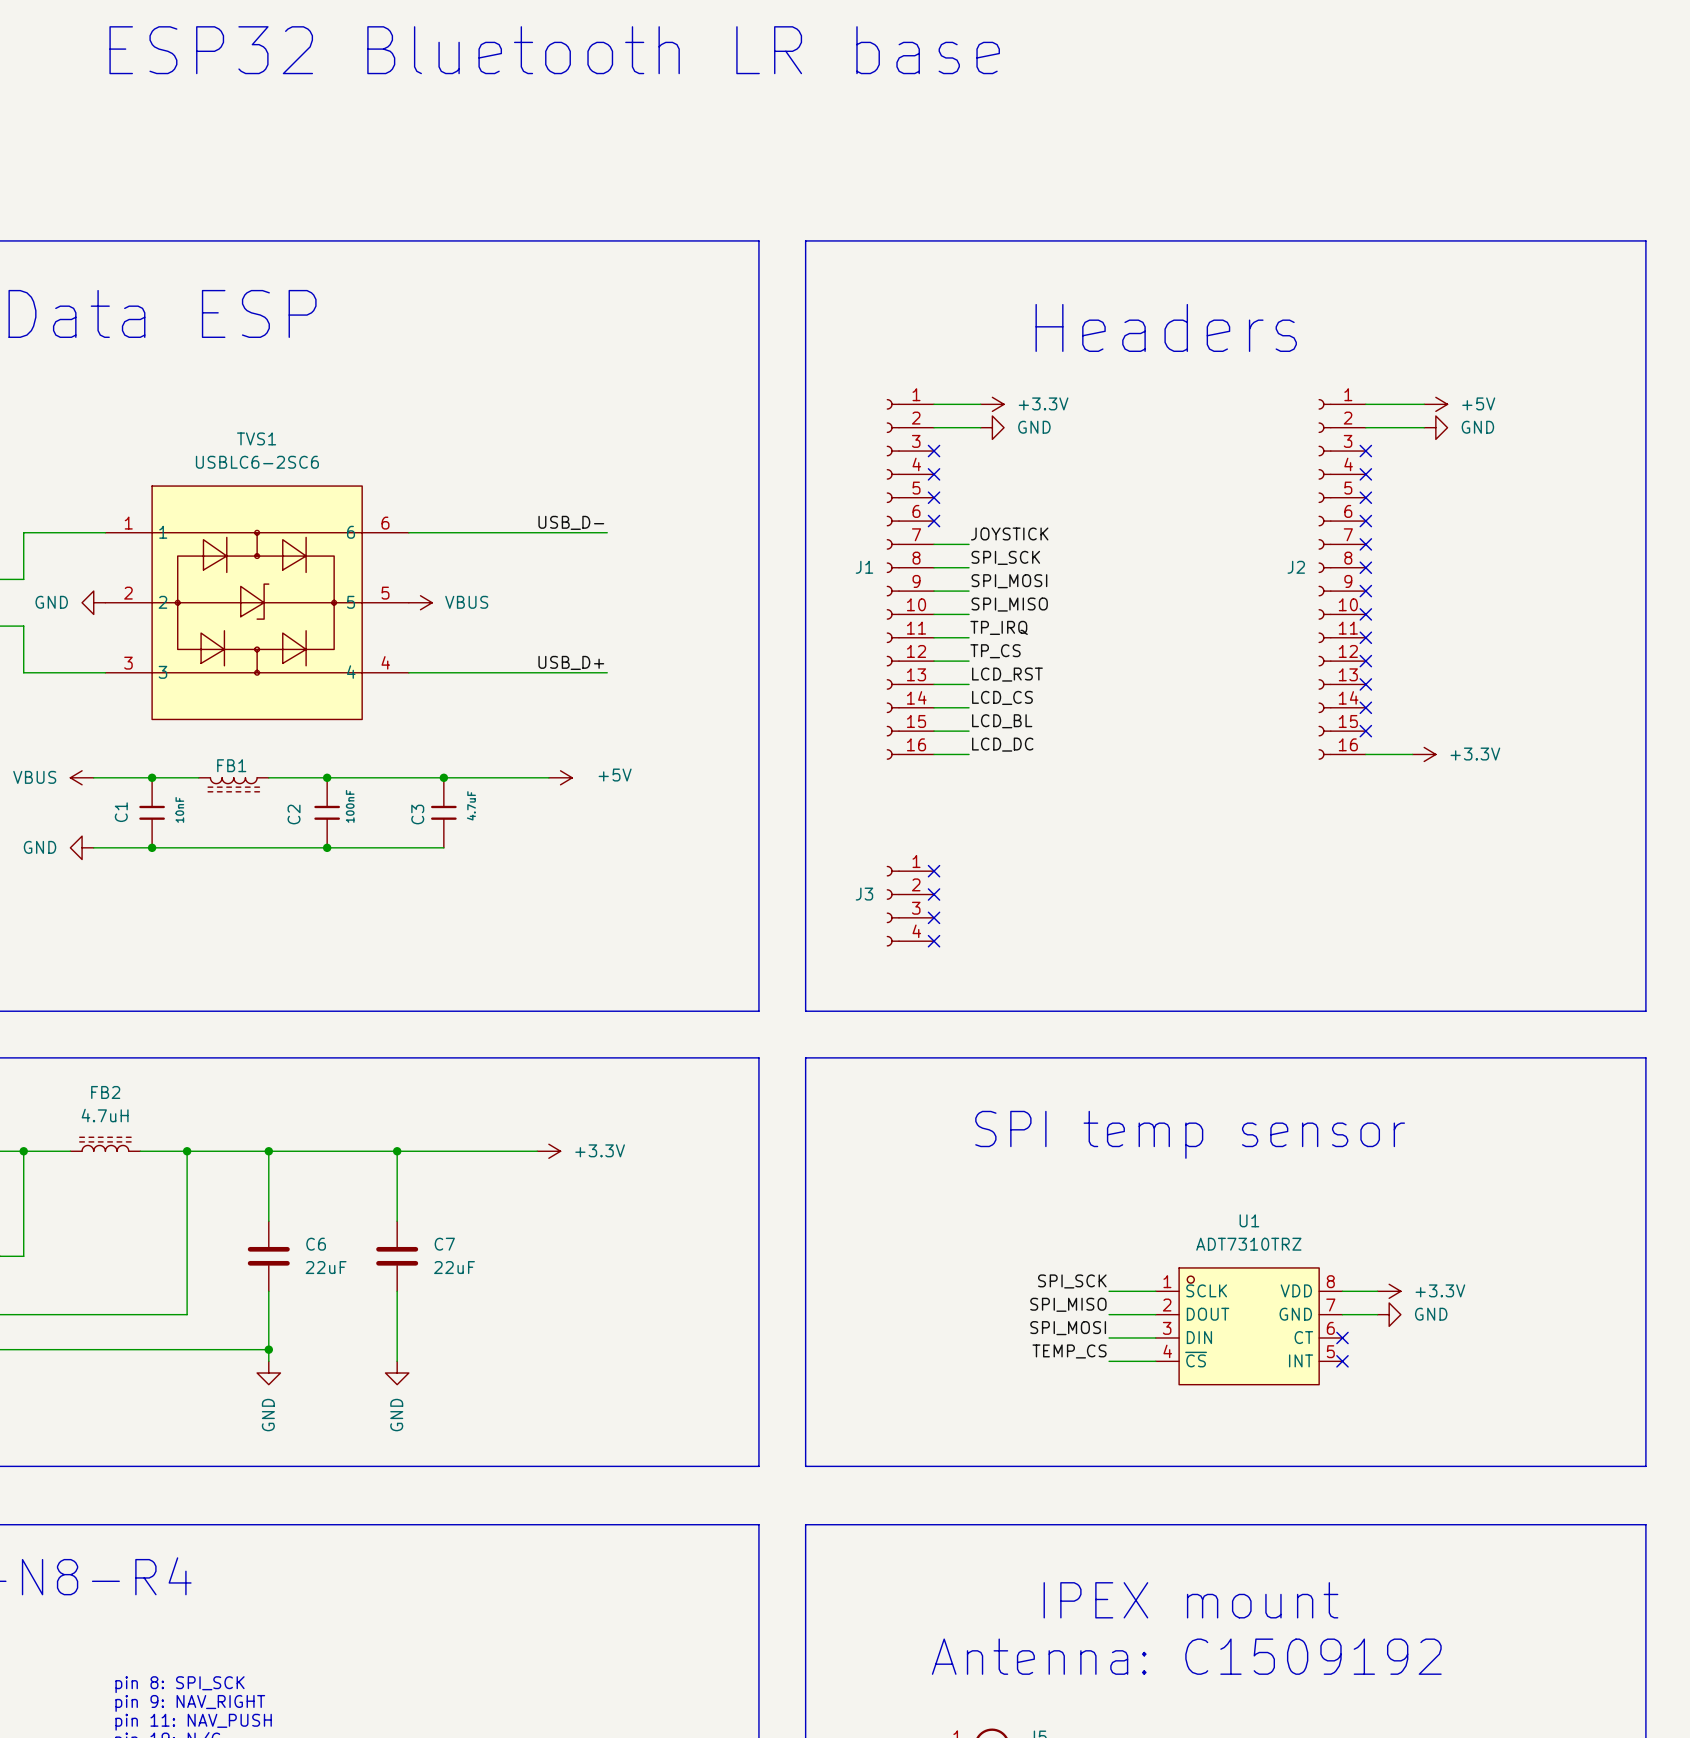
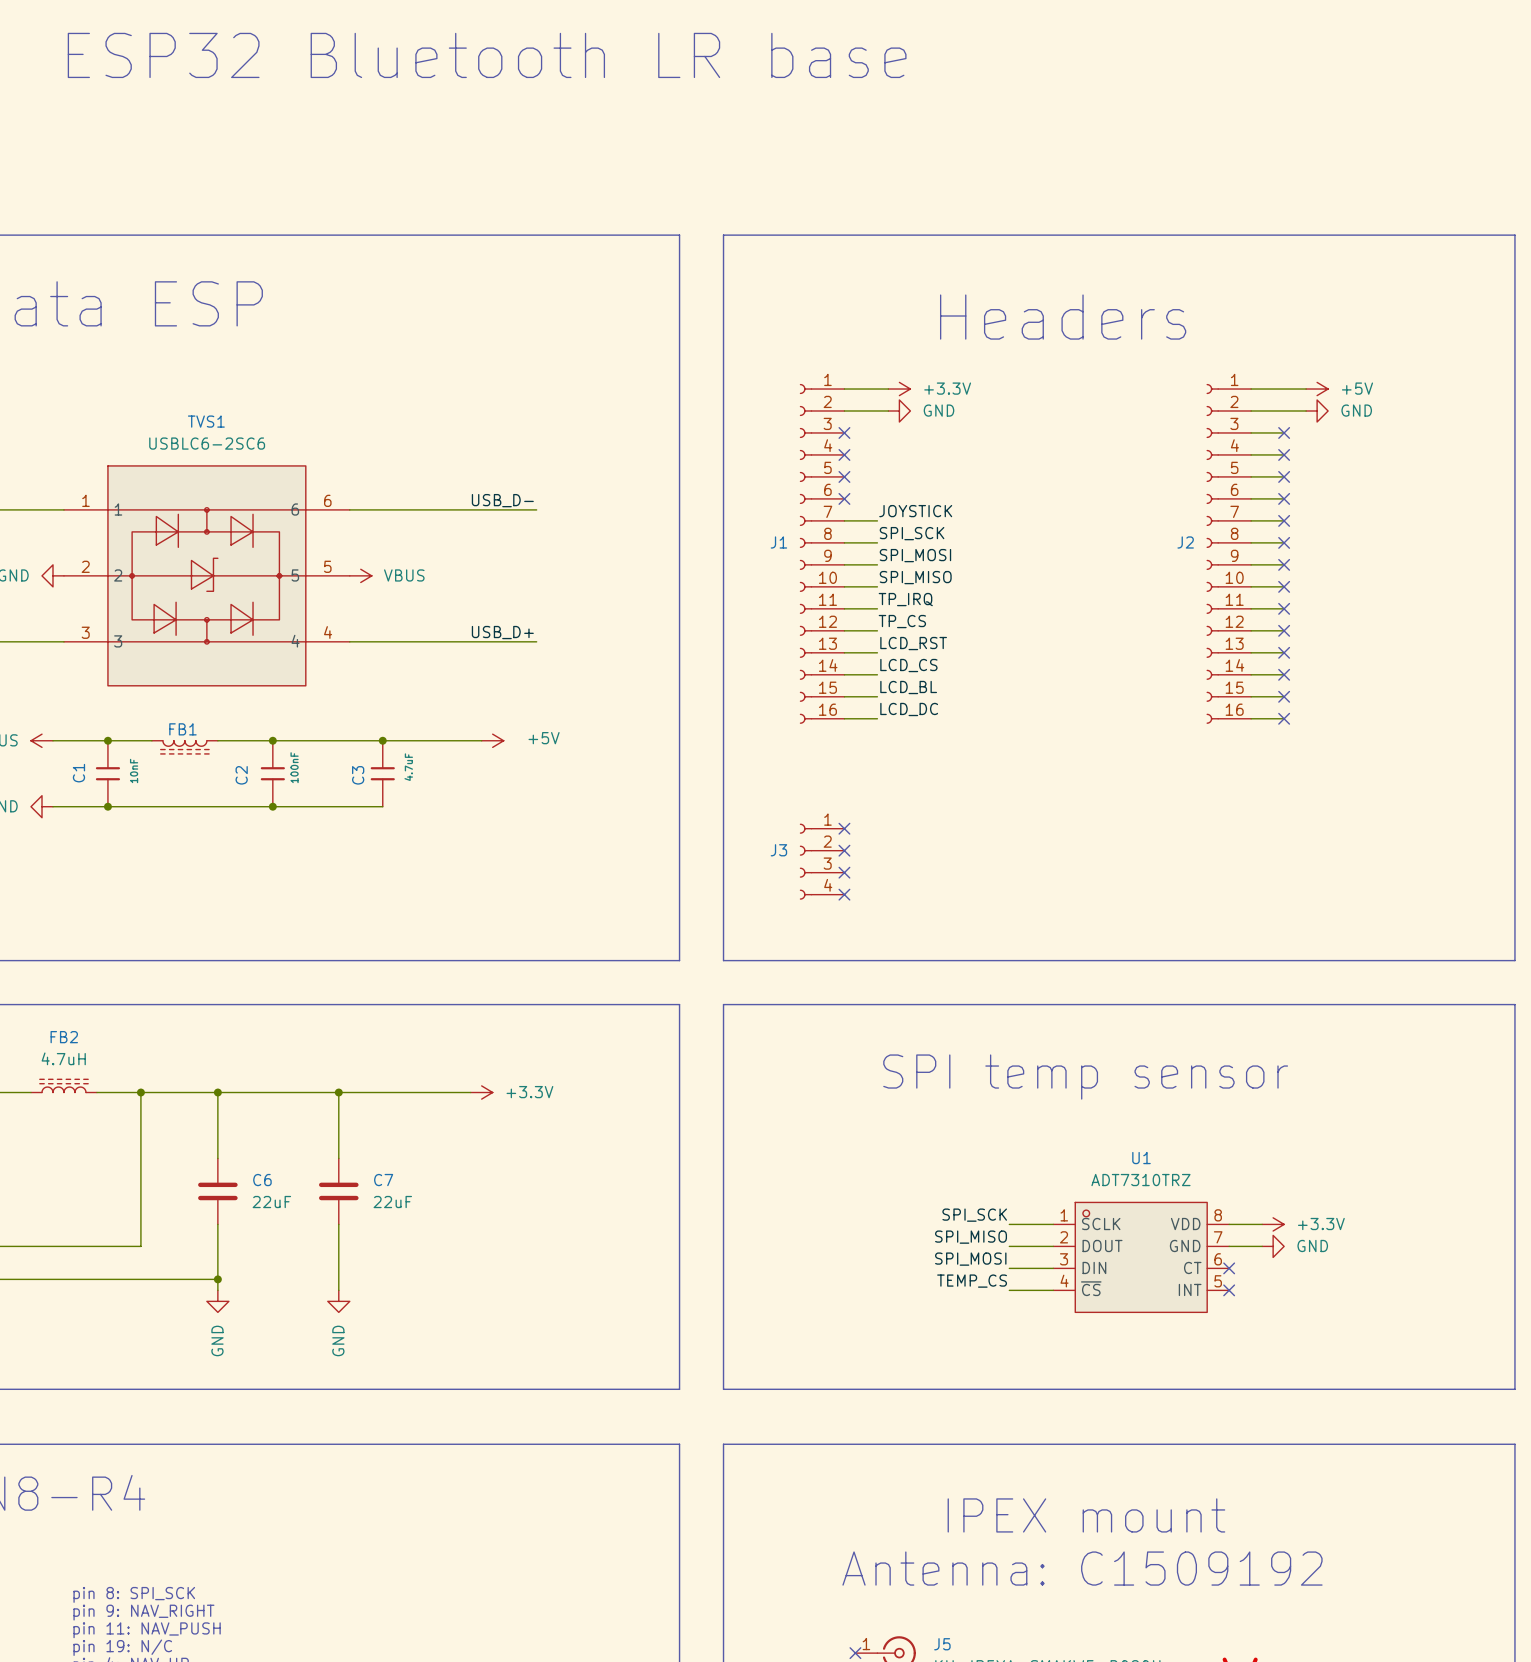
wire: none -> (1251, 432) (1284, 432)
no-connect mark: (1365, 451) -> none
no-connect mark: none -> (1284, 432)
wire: none -> (1251, 454) (1284, 454)
no-connect mark: (1365, 474) -> none
no-connect mark: none -> (1284, 454)
wire: none -> (1251, 476) (1284, 476)
no-connect mark: (1365, 497) -> none
no-connect mark: none -> (1284, 476)
wire: none -> (1251, 498) (1284, 498)
no-connect mark: (1365, 521) -> none
no-connect mark: none -> (1284, 498)
wire: none -> (1251, 520) (1284, 520)
no-connect mark: (1365, 544) -> none
no-connect mark: none -> (1284, 520)
wire: none -> (1251, 542) (1284, 542)
no-connect mark: (1365, 567) -> none
no-connect mark: none -> (1284, 542)
wire: none -> (1251, 564) (1284, 564)
no-connect mark: (1365, 591) -> none
no-connect mark: none -> (1284, 564)
wire: none -> (1251, 586) (1284, 586)
no-connect mark: (1365, 614) -> none
no-connect mark: none -> (1284, 586)
wire: none -> (1251, 608) (1284, 608)
no-connect mark: (1365, 637) -> none
no-connect mark: none -> (1284, 608)
wire: none -> (1251, 630) (1284, 630)
no-connect mark: (1365, 661) -> none
no-connect mark: none -> (1284, 630)
wire: none -> (1251, 652) (1284, 652)
no-connect mark: (1365, 684) -> none
no-connect mark: none -> (1284, 652)
wire: none -> (1251, 674) (1284, 674)
no-connect mark: (1365, 707) -> none
no-connect mark: none -> (1284, 674)
wire: none -> (1251, 696) (1284, 696)
no-connect mark: (1365, 731) -> none
no-connect mark: none -> (1284, 696)
wire: (1400, 754) (1412, 754) -> none
no-connect mark: none -> (1284, 718)
power symbol: +3.3V (1424, 754) -> none

